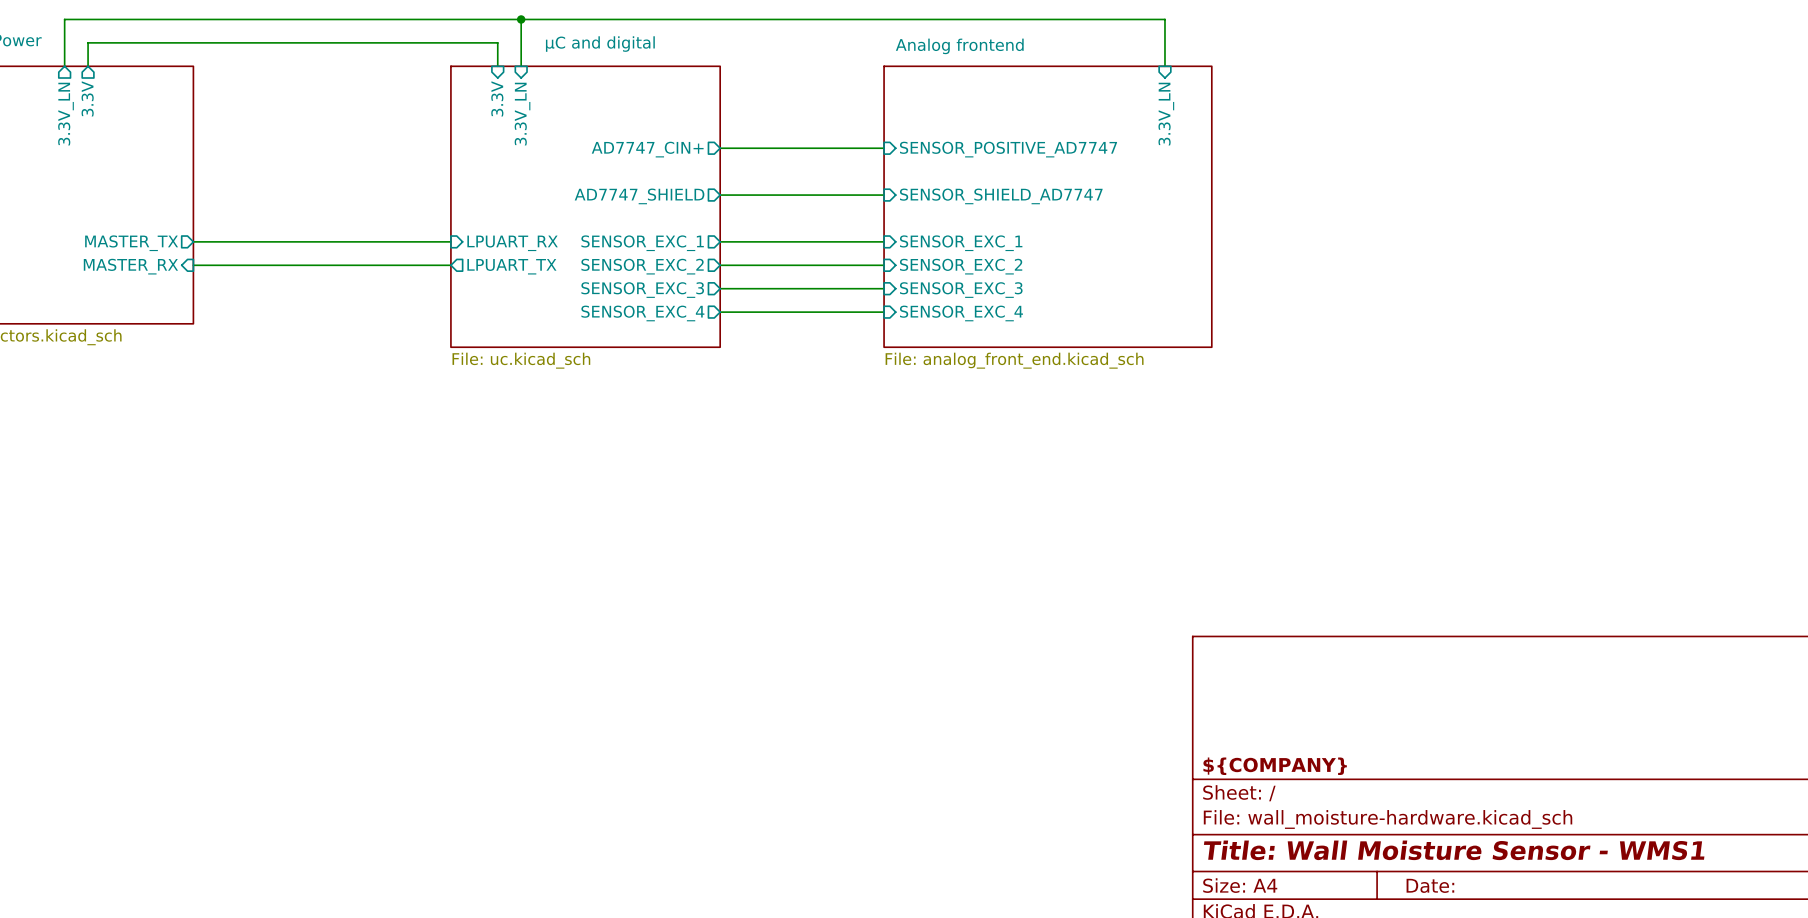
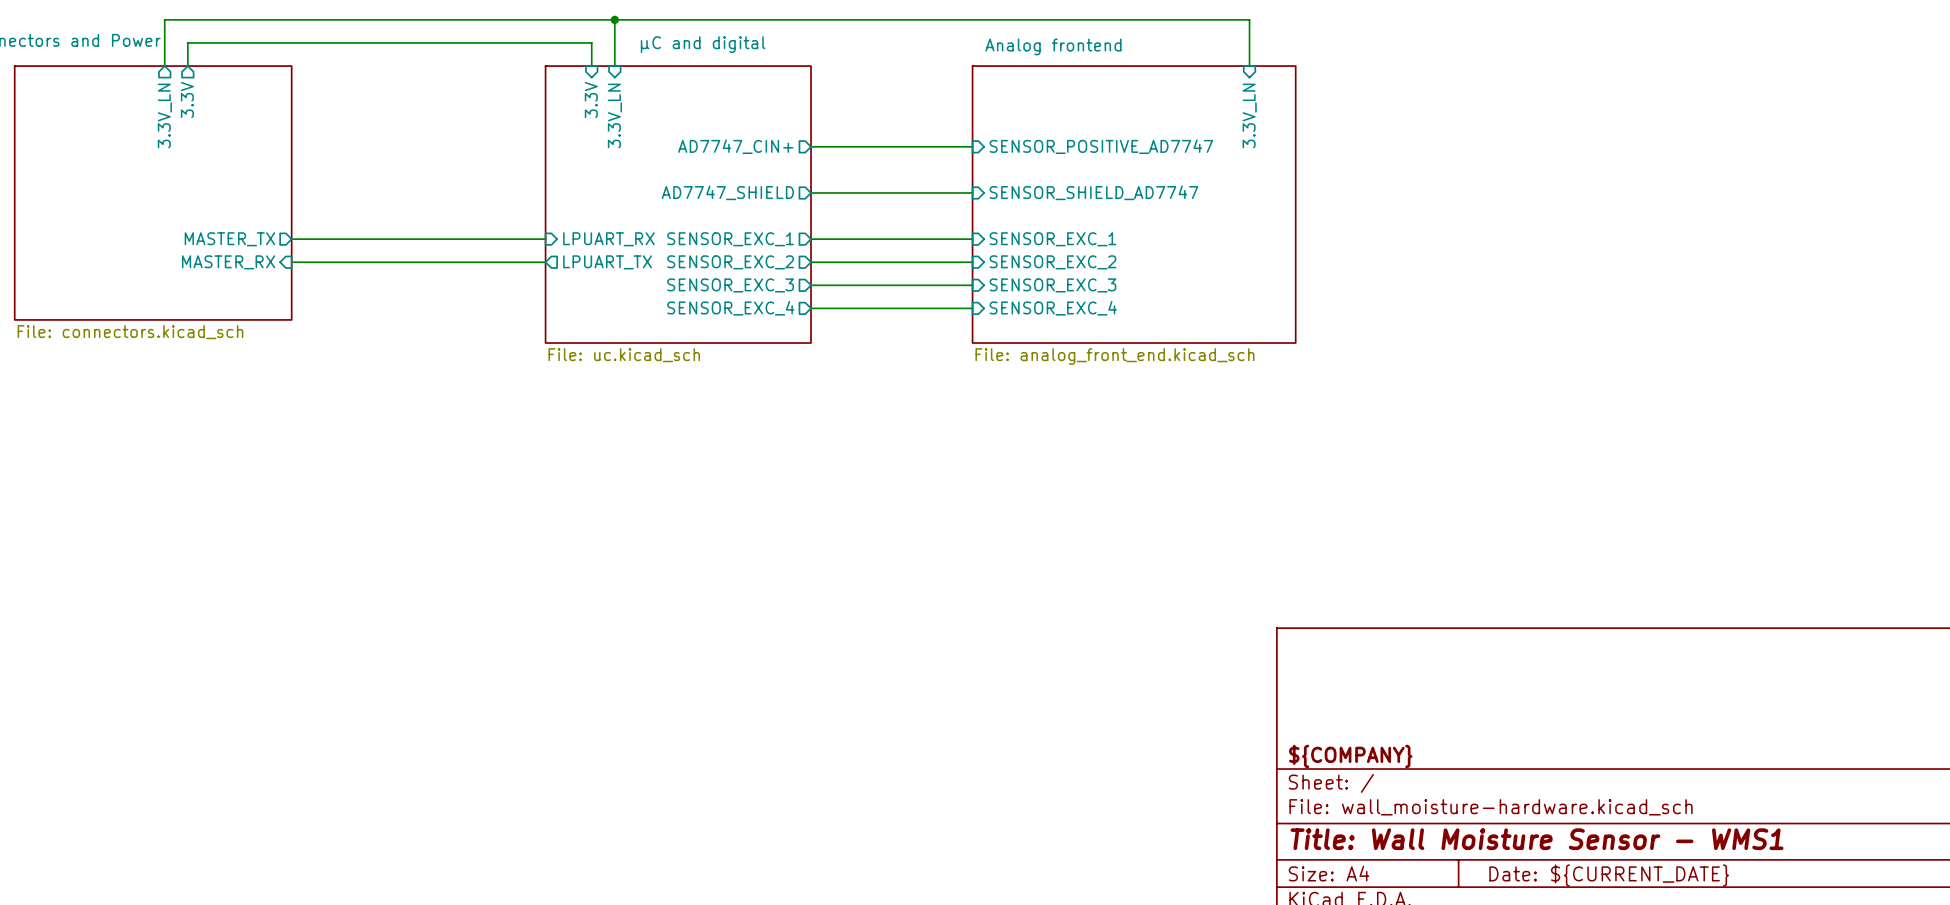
title block: Date: (1430, 885) -> Date: ${CURRENT_DATE} (1609, 875)

